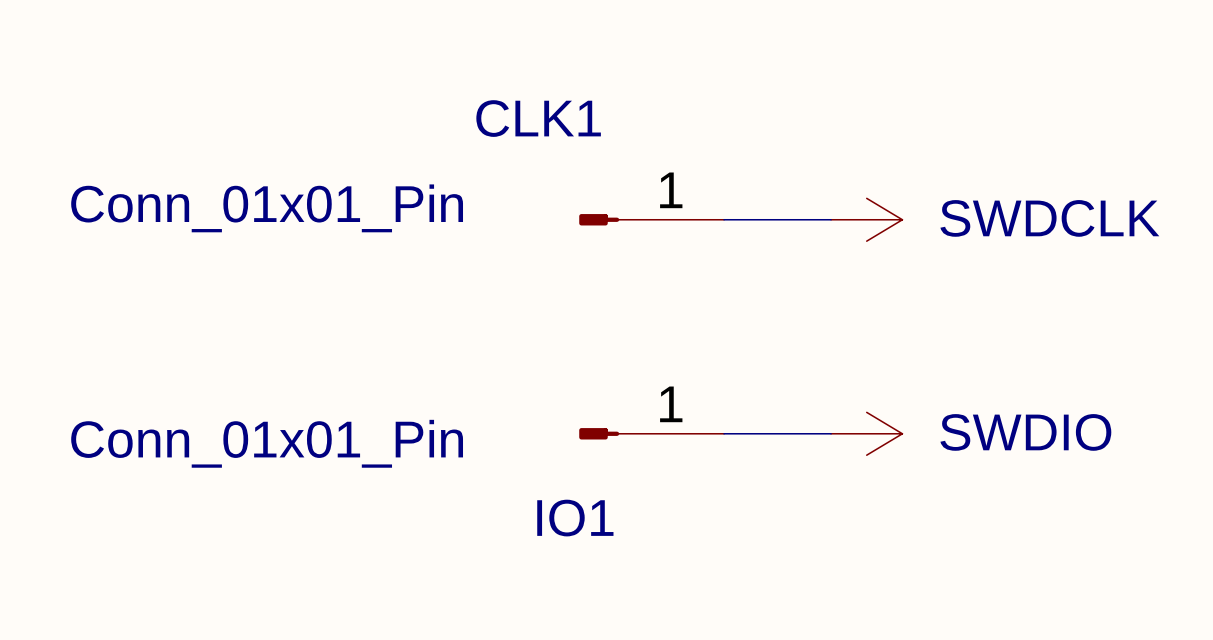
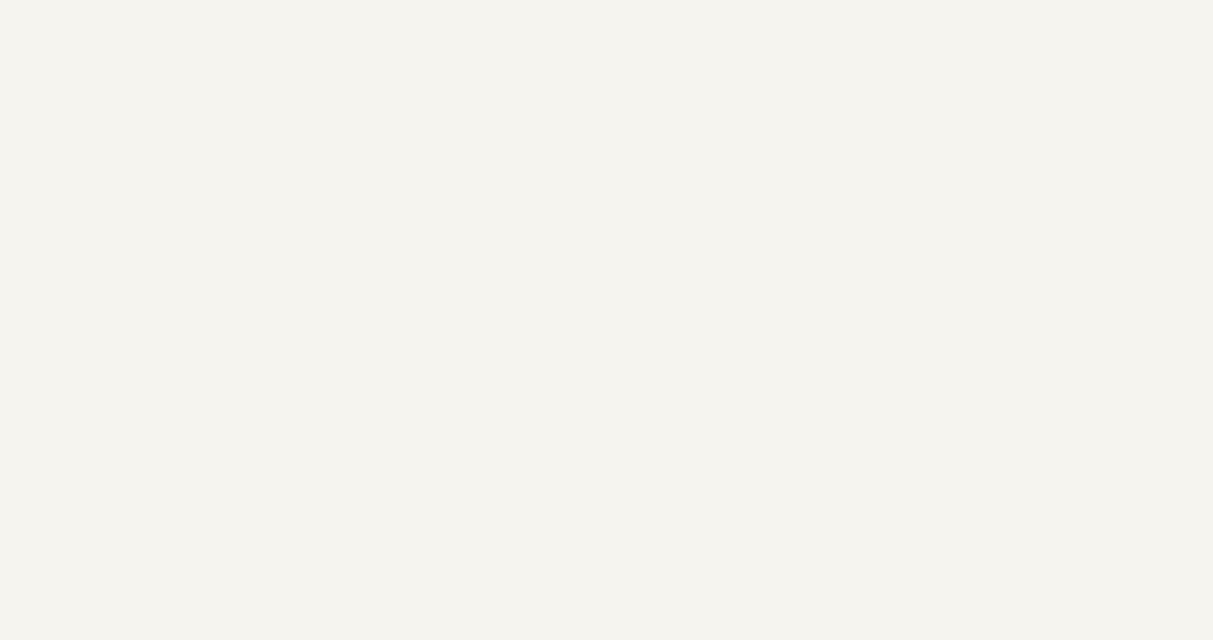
CLK1: Conn_01x01_Pin (651, 219) -> none
wire: (724, 219) (831, 219) -> none
power symbol: SWDCLK (866, 219) -> none
IO1: Conn_01x01_Pin (651, 433) -> none
wire: (724, 433) (831, 433) -> none
power symbol: SWDIO (866, 433) -> none

